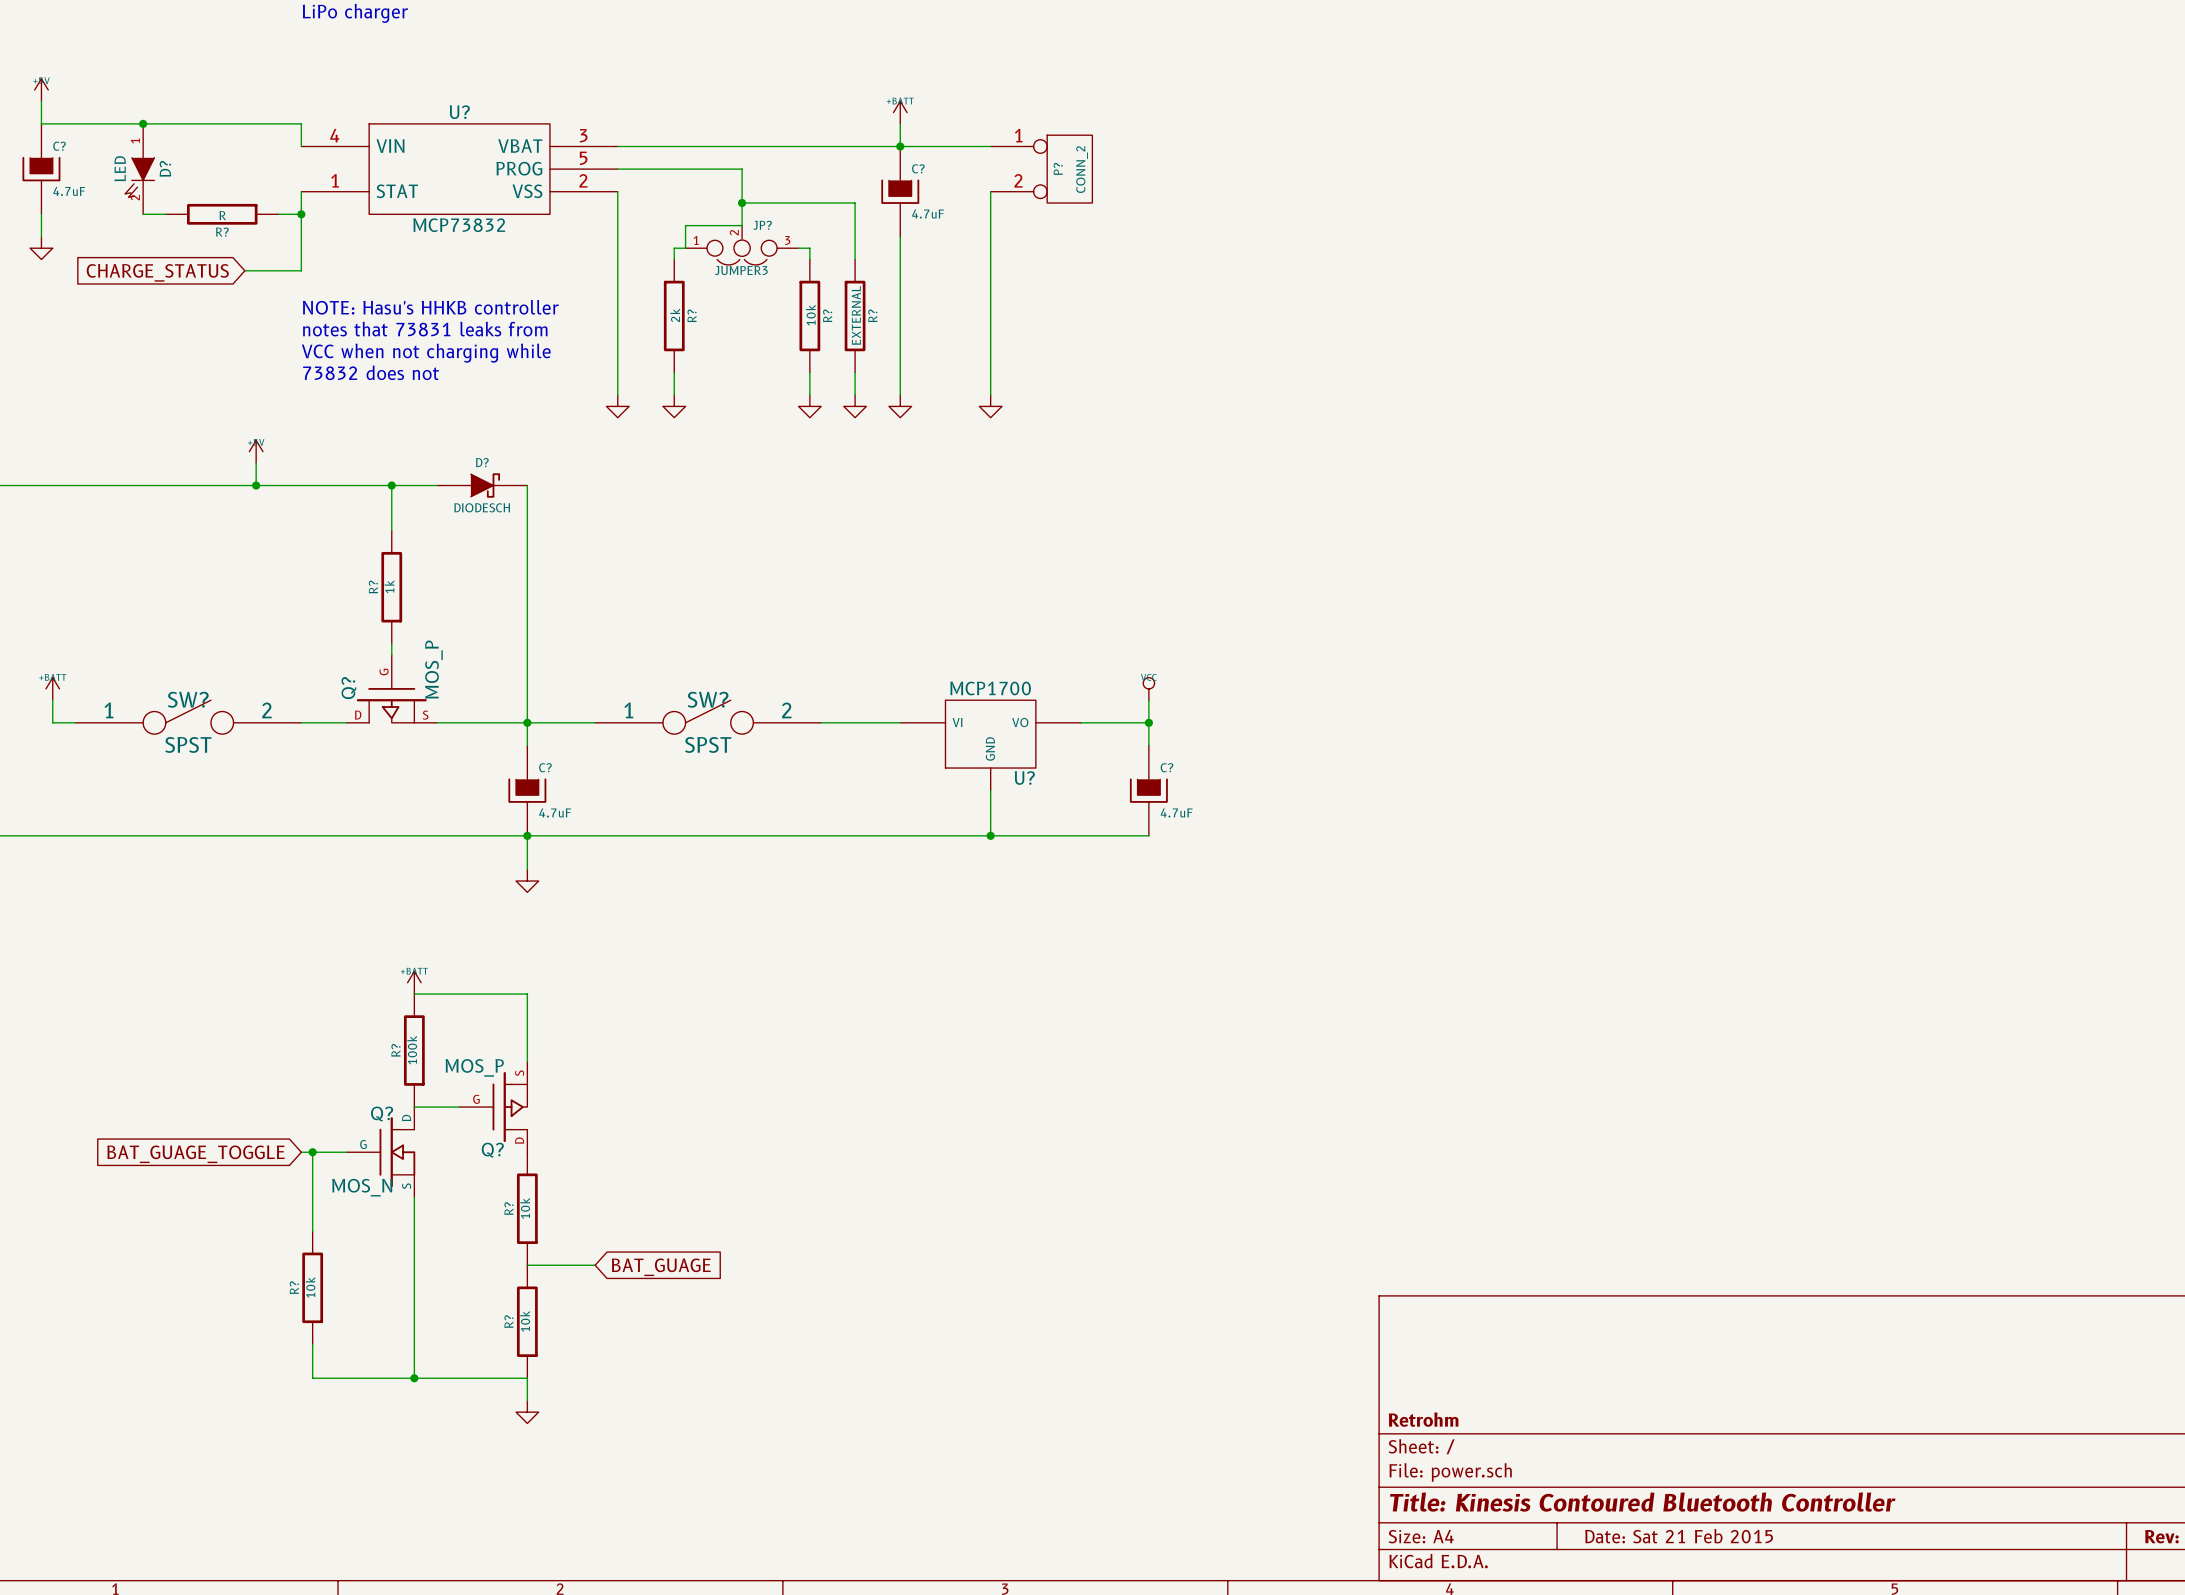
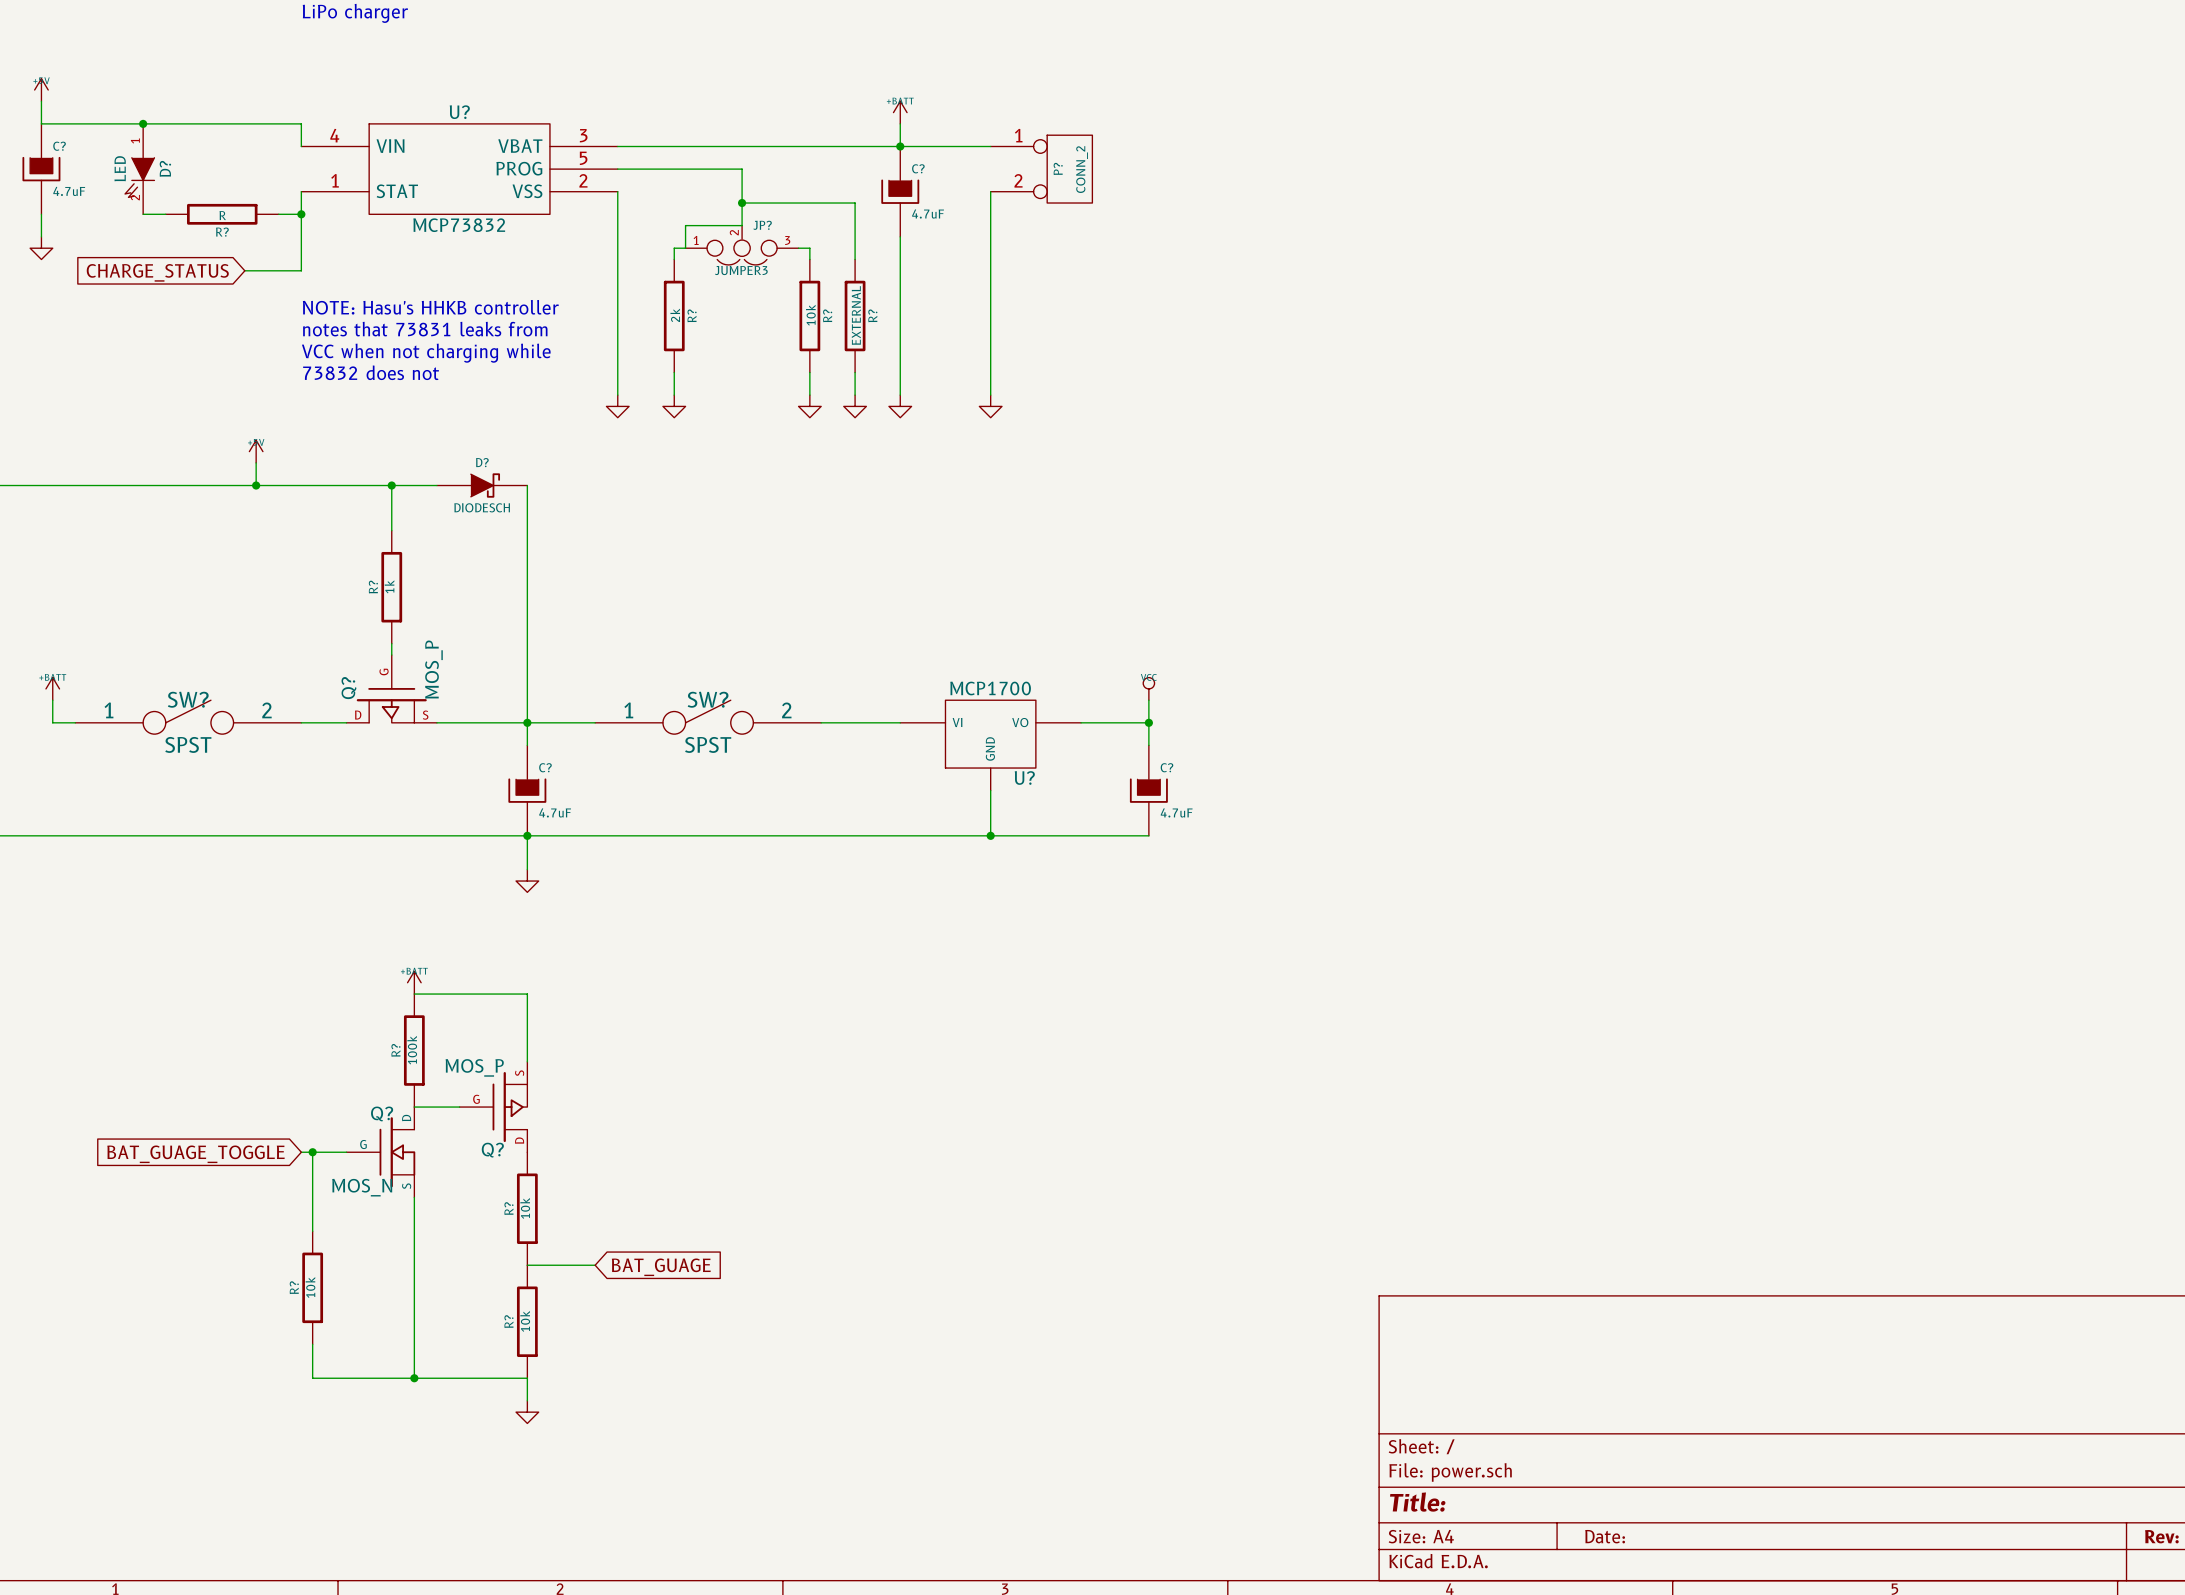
title block: Retrohm (1423, 1419) -> none
title block: Title: Kinesis Contoured Bluetooth Controller (1642, 1502) -> Title: (1417, 1502)
title block: Date: Sat 21 Feb 2015 (1679, 1536) -> Date: (1605, 1536)

